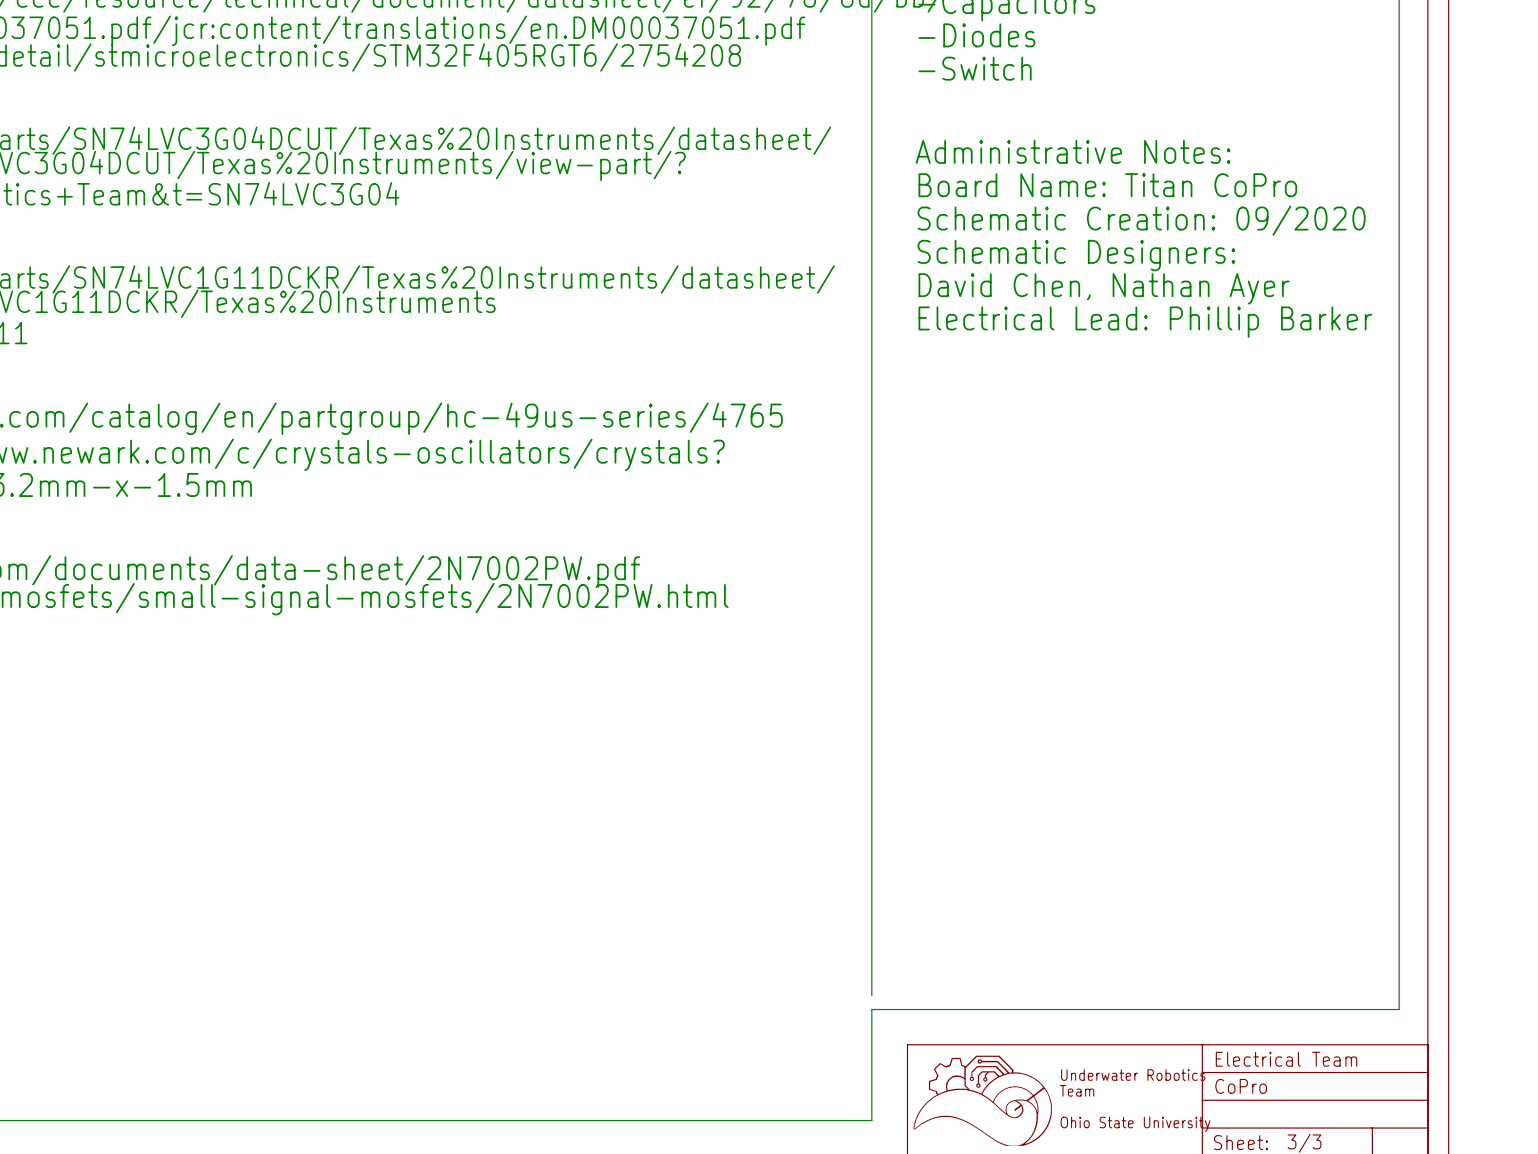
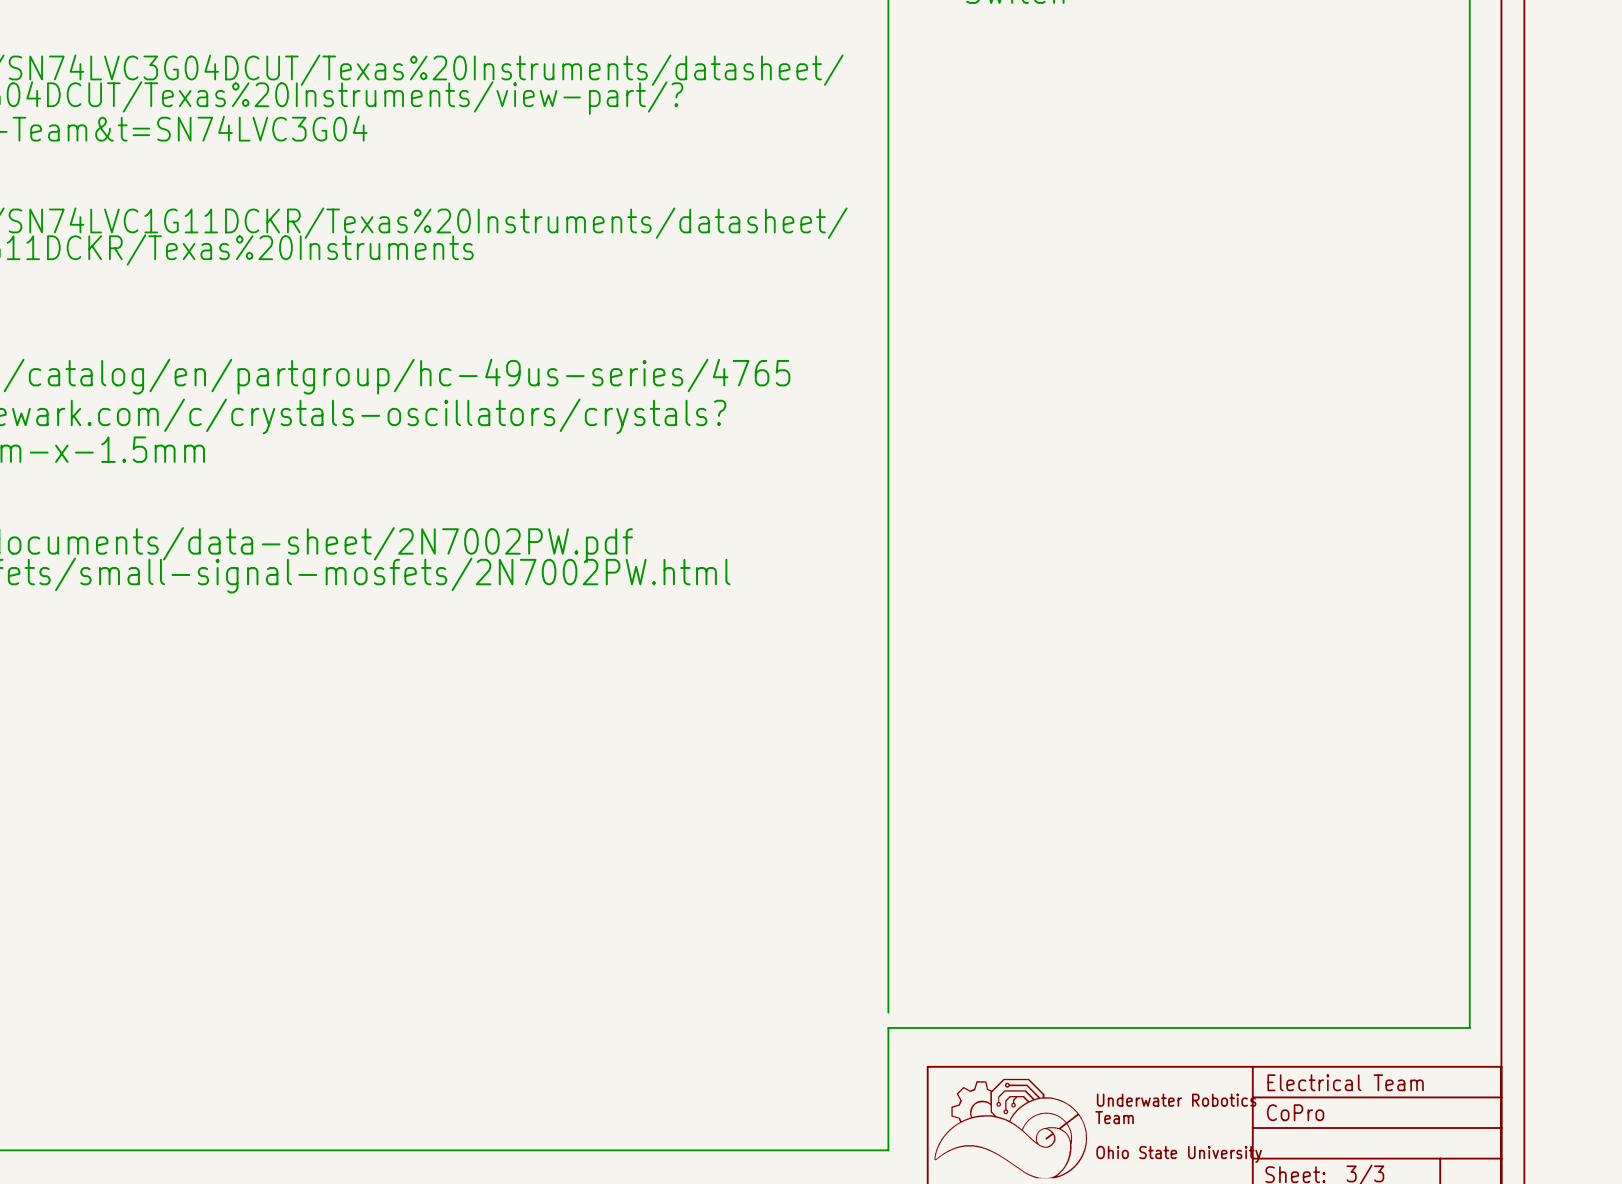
text: Administrative Notes: (1073, 151) -> none
text: Board Name: Titan CoPro (1107, 185) -> none
text: Schematic Creation: 09/2020 (1141, 220) -> none
text: Schematic Designers: (1076, 255) -> none
text: David Chen, Nathan Ayer (1103, 288) -> none
text: Electrical Lead: Phillip Barker (1145, 322) -> none

